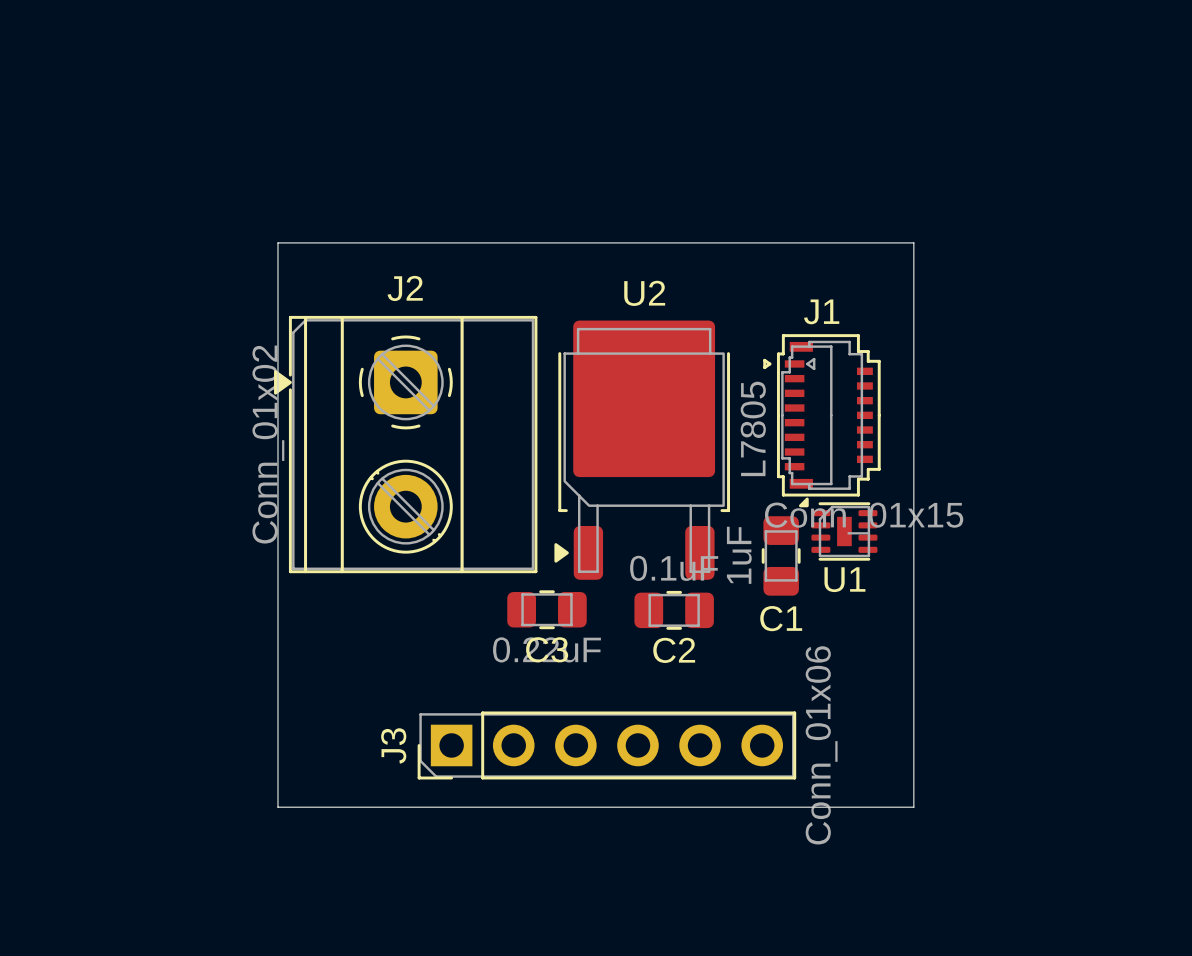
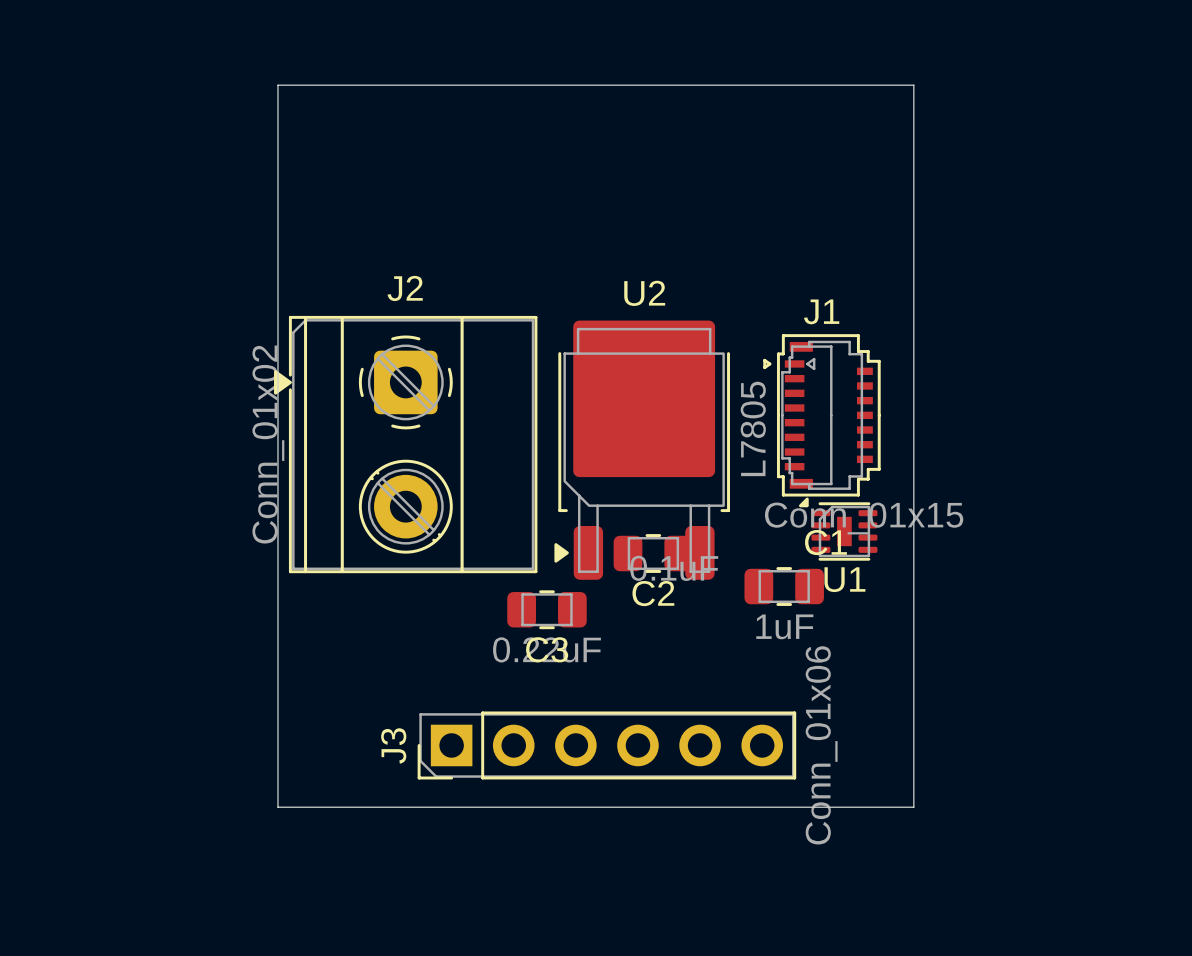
board edge: (277, 242) (913, 242) -> (277, 242) (277, 85) (913, 85) (913, 242)
C1 value position: 1uF (739, 555) -> 1uF (784, 626)
C1 rotation: 0° (781, 555) -> 90° clockwise (784, 586)
C2 position: (674, 610) -> (653, 553)
C1 name position: C1 (781, 618) -> C1 (825, 542)

